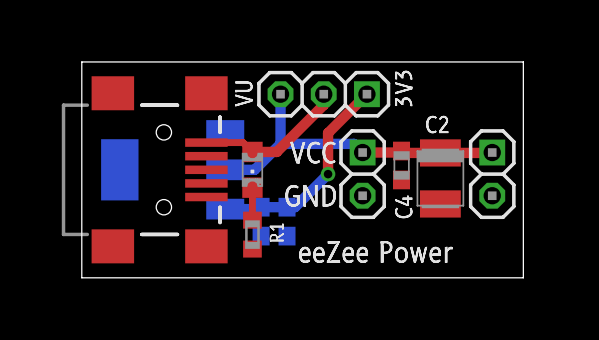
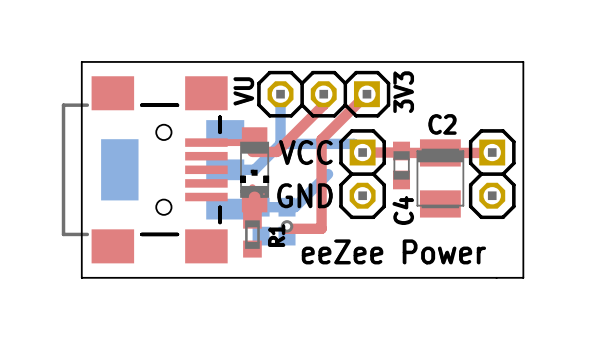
top track: (328, 133) (328, 174) -> (328, 133) (321, 139) (321, 228) (287, 228) (287, 226)
part footprint: [241, 141, 264, 198] -> [240, 127, 270, 213]
via: (328, 174) -> none
drawing: none -> [240, 175, 270, 183]
via: none -> (287, 226)

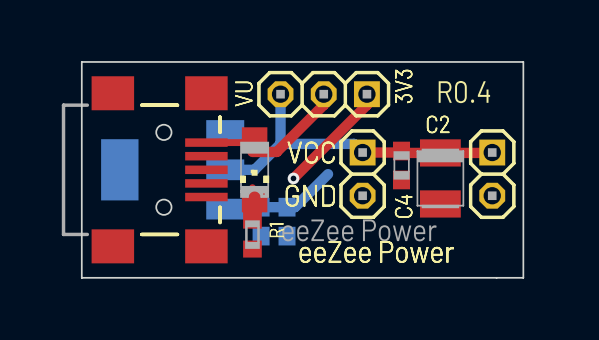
text: none -> R0.4 (464, 92)
top track: (366, 94) (321, 139) (321, 228) (287, 228) (287, 226) -> (366, 94) (366, 105) (293, 178)
via: none -> (293, 178)
via: (287, 226) -> none
text: none -> eeZee Power (359, 230)

